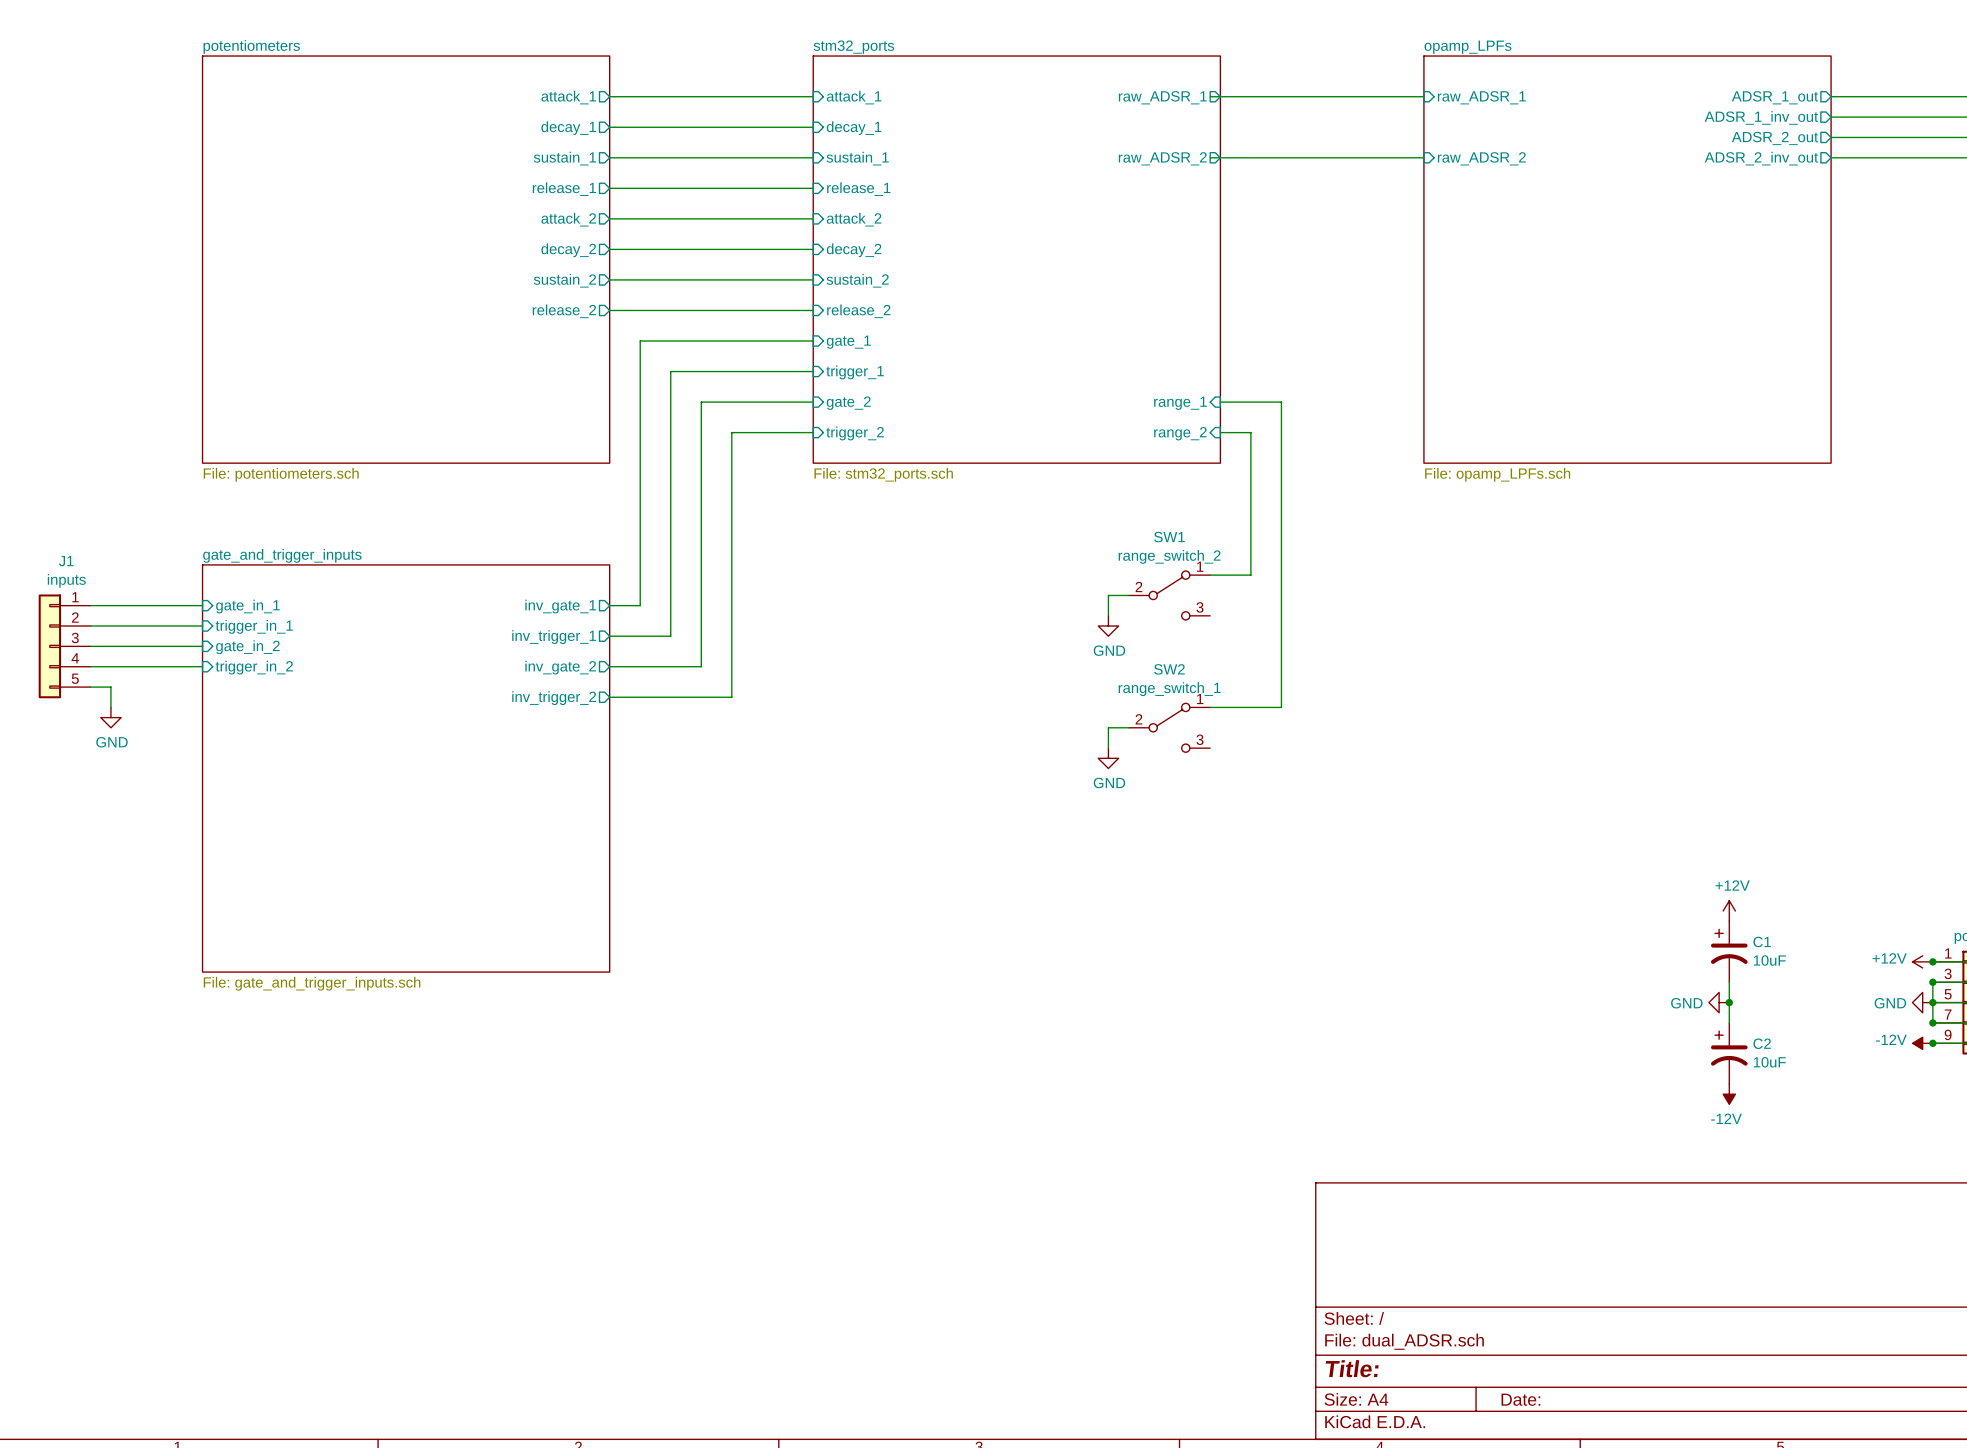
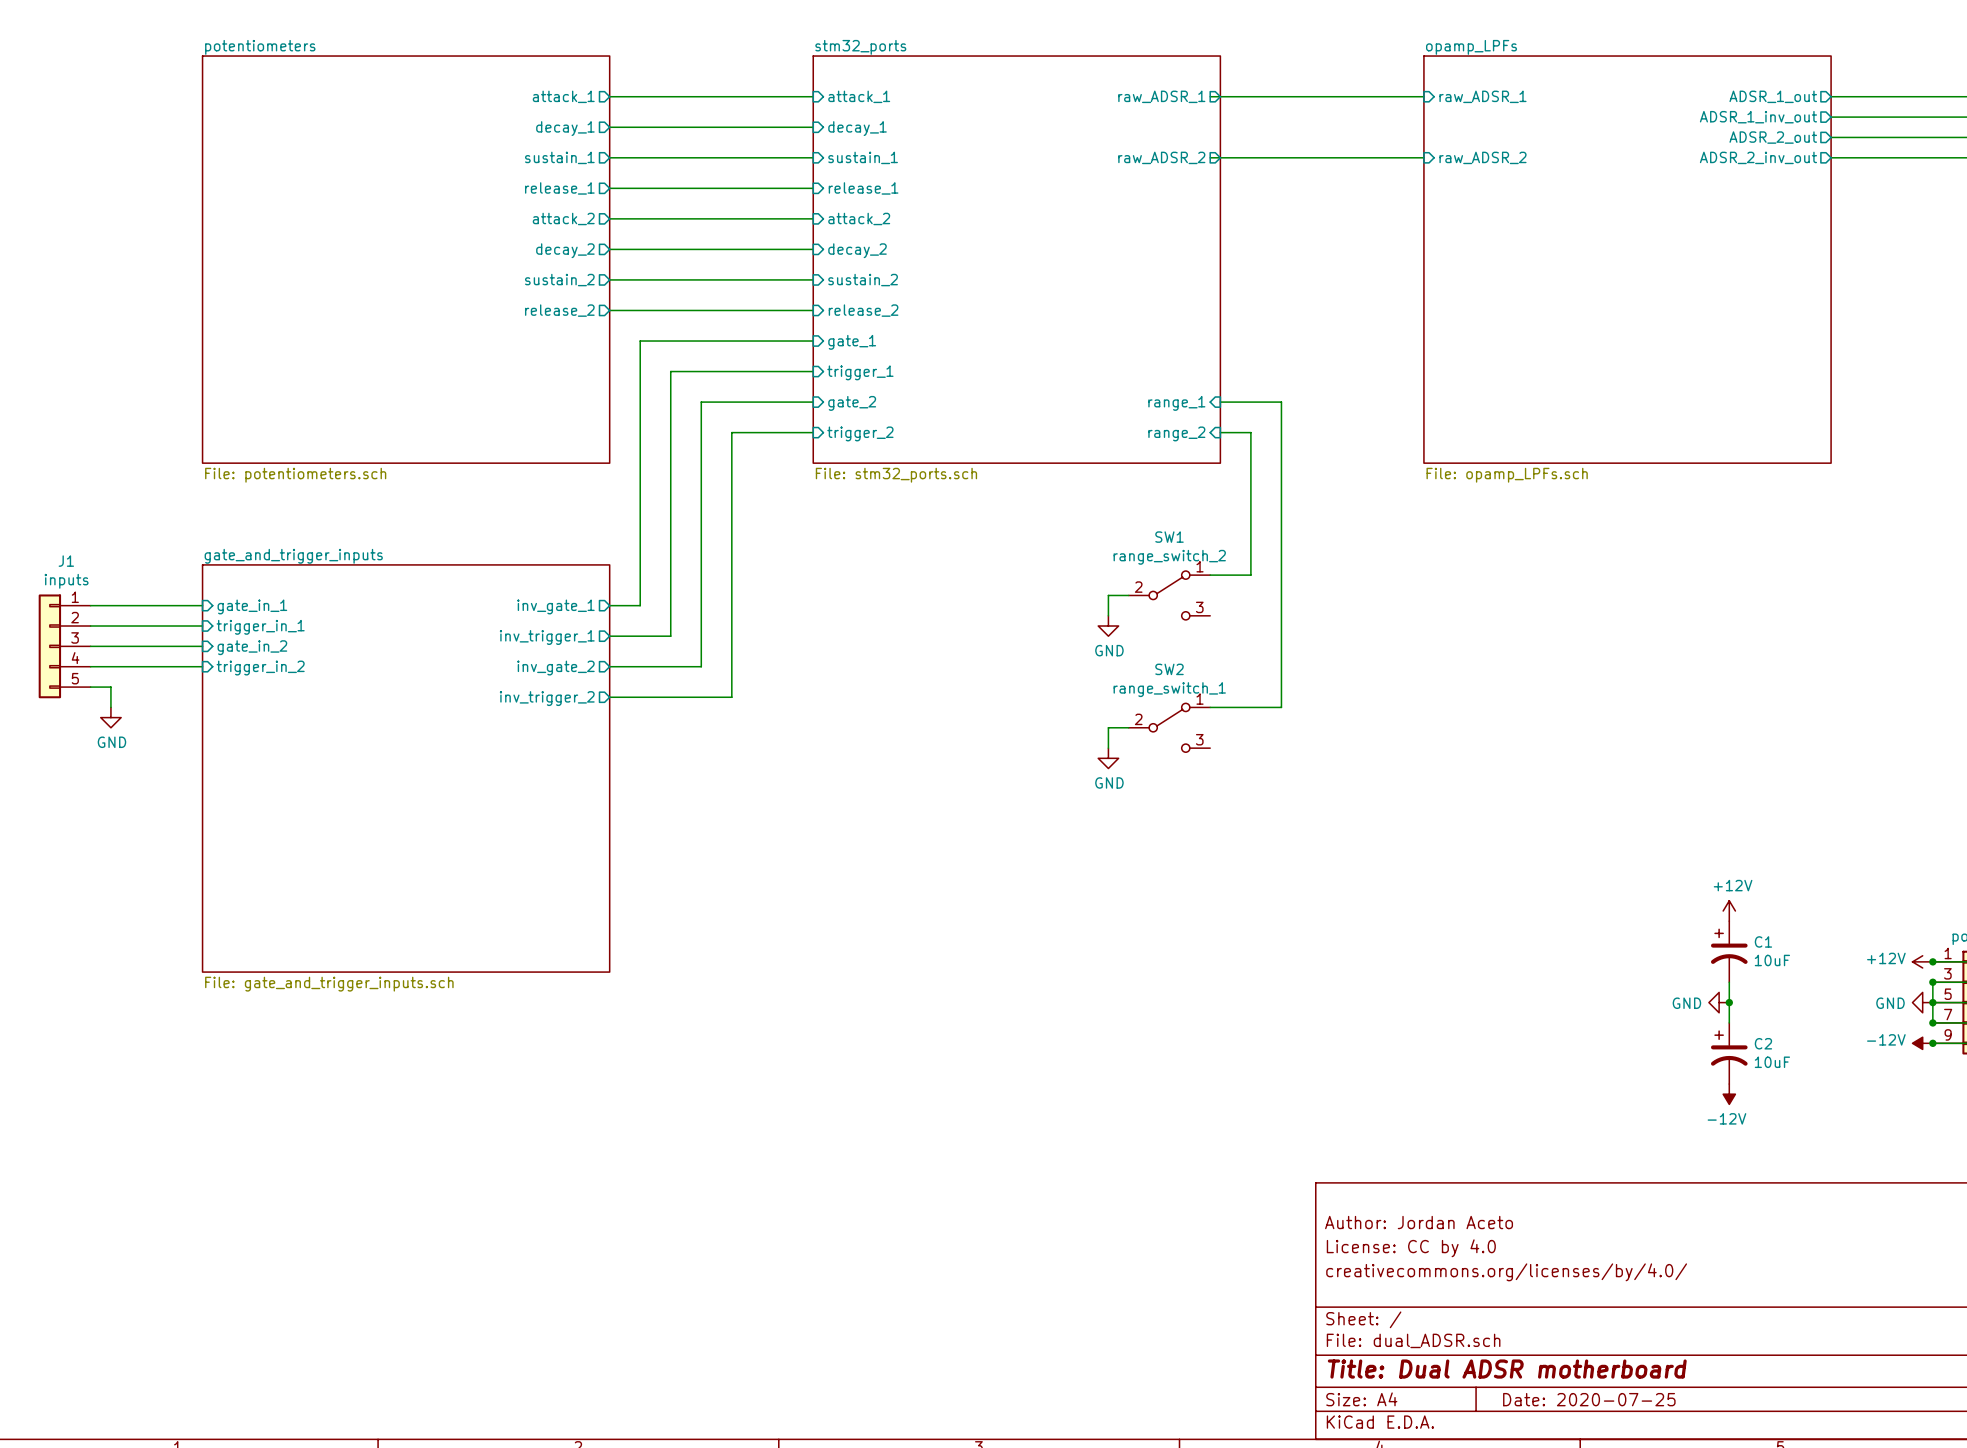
title block: none -> Author: Jordan Aceto (1419, 1222)
title block: none -> License: CC by 4.0 (1411, 1248)
title block: none -> creativecommons.org/licenses/by/4.0/ (1506, 1272)
title block: Title: (1352, 1368) -> Title: Dual ADSR motherboard (1507, 1369)
title block: Date: (1520, 1399) -> Date: 2020-07-25 (1589, 1399)

